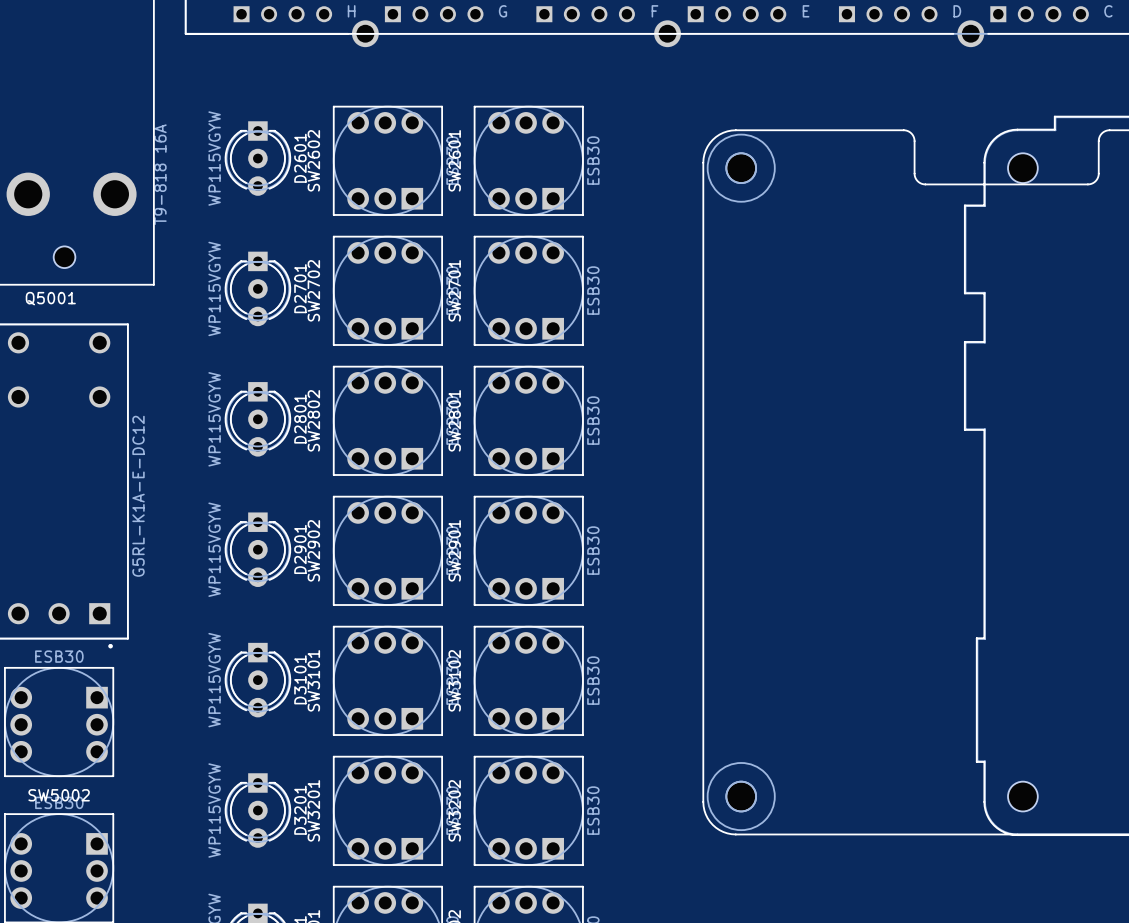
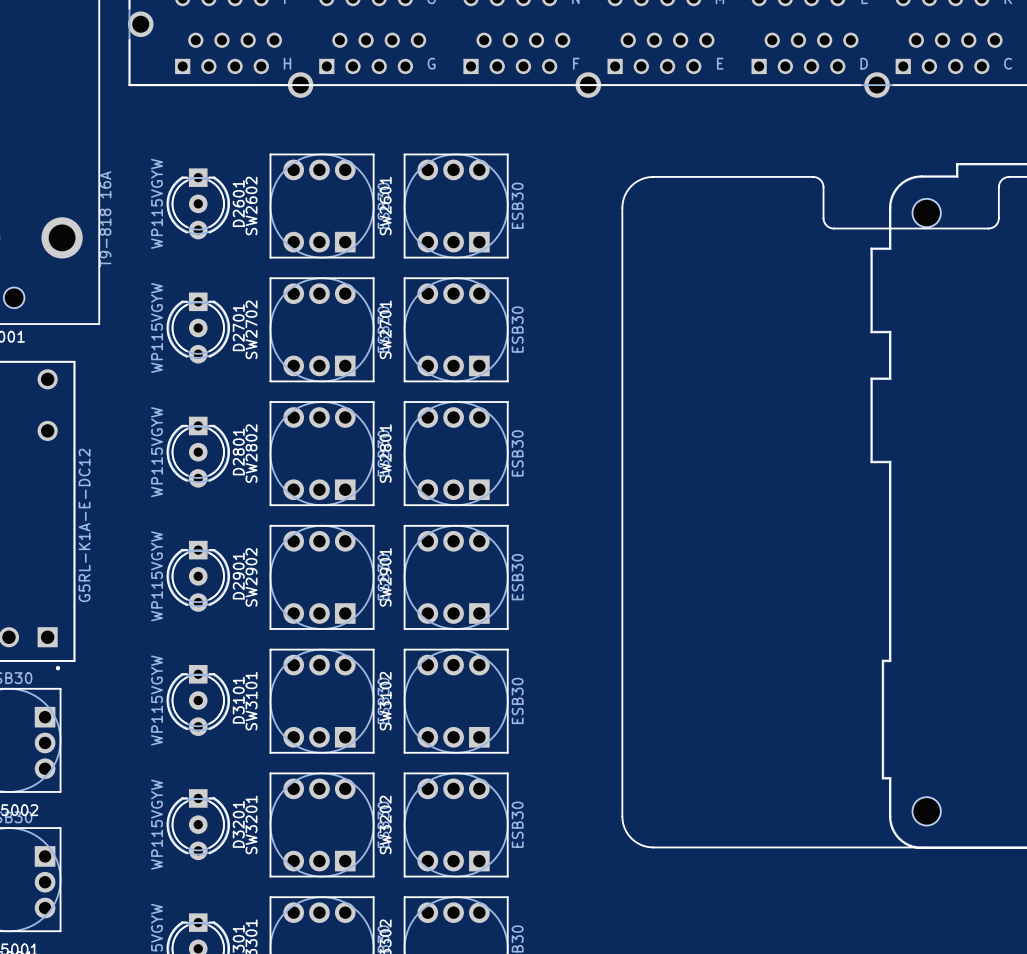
part: (741, 168) -> none
part: (741, 796) -> none

